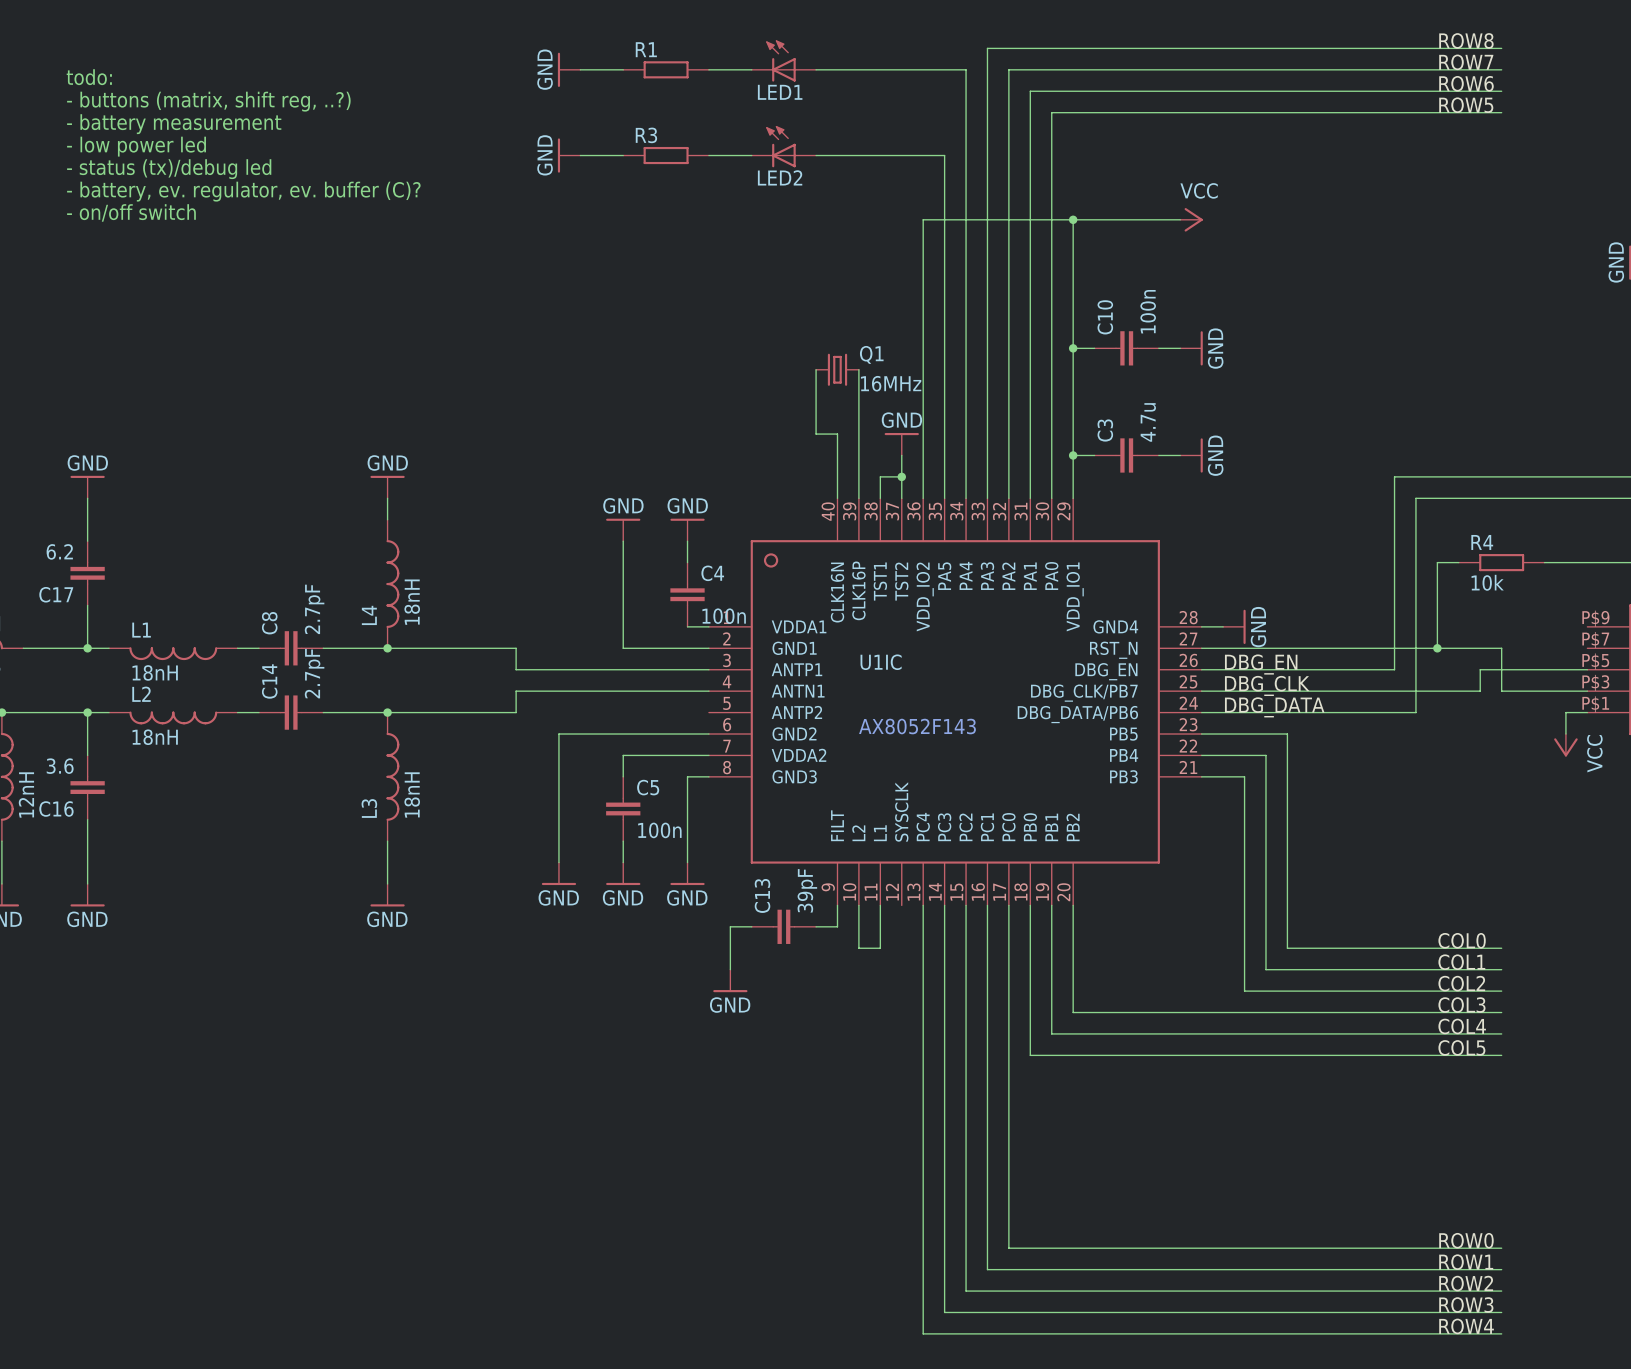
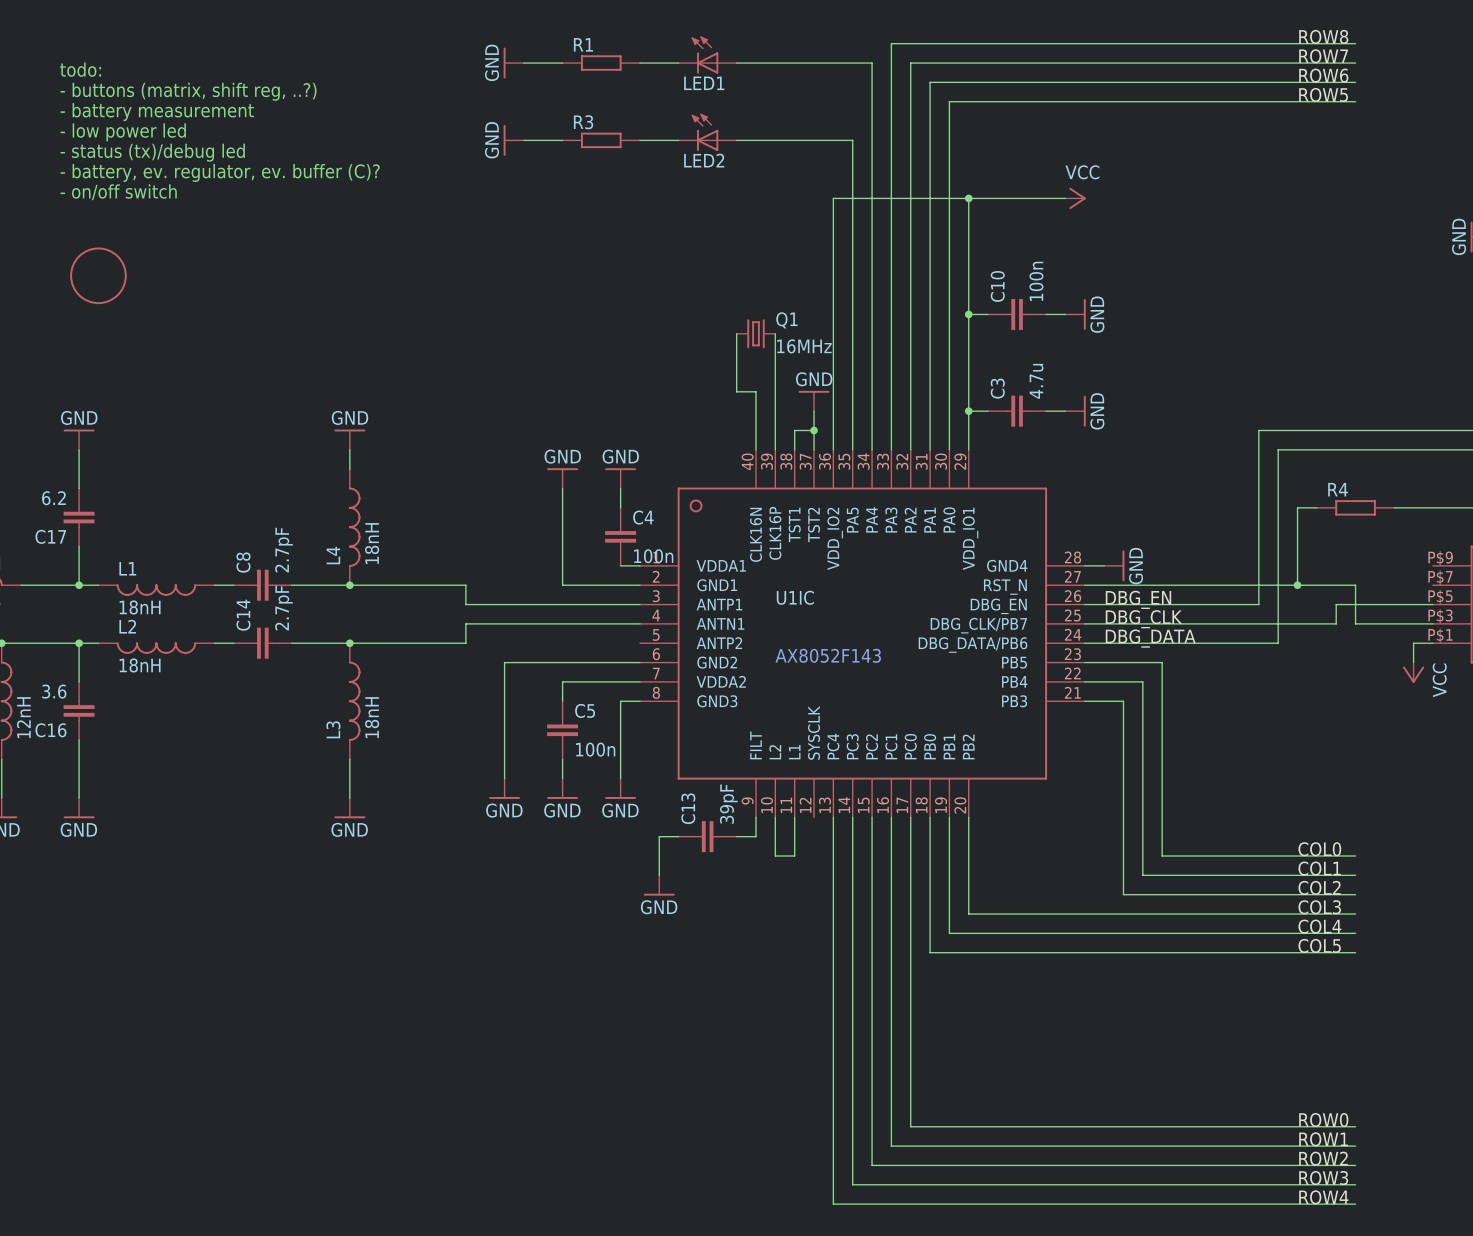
part: none -> (98, 275)
R4 value: 10k (1487, 582) -> none

